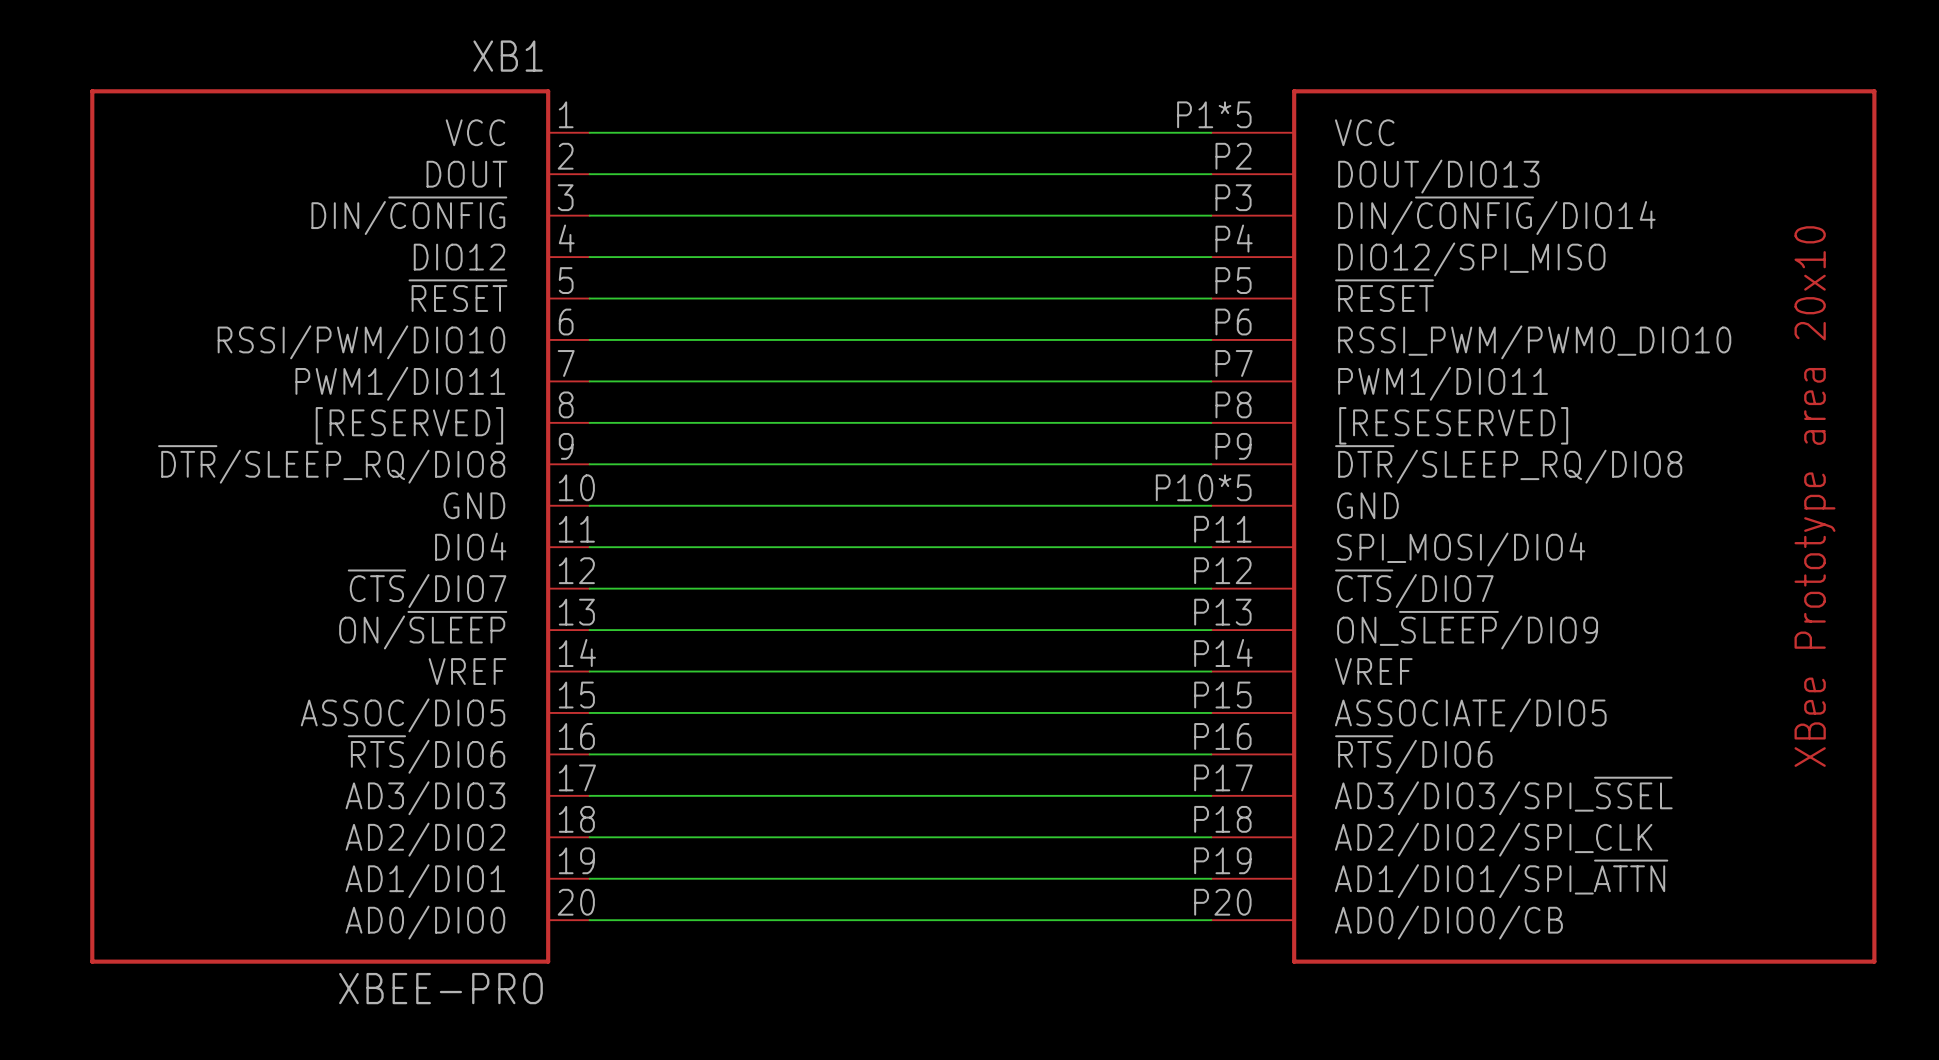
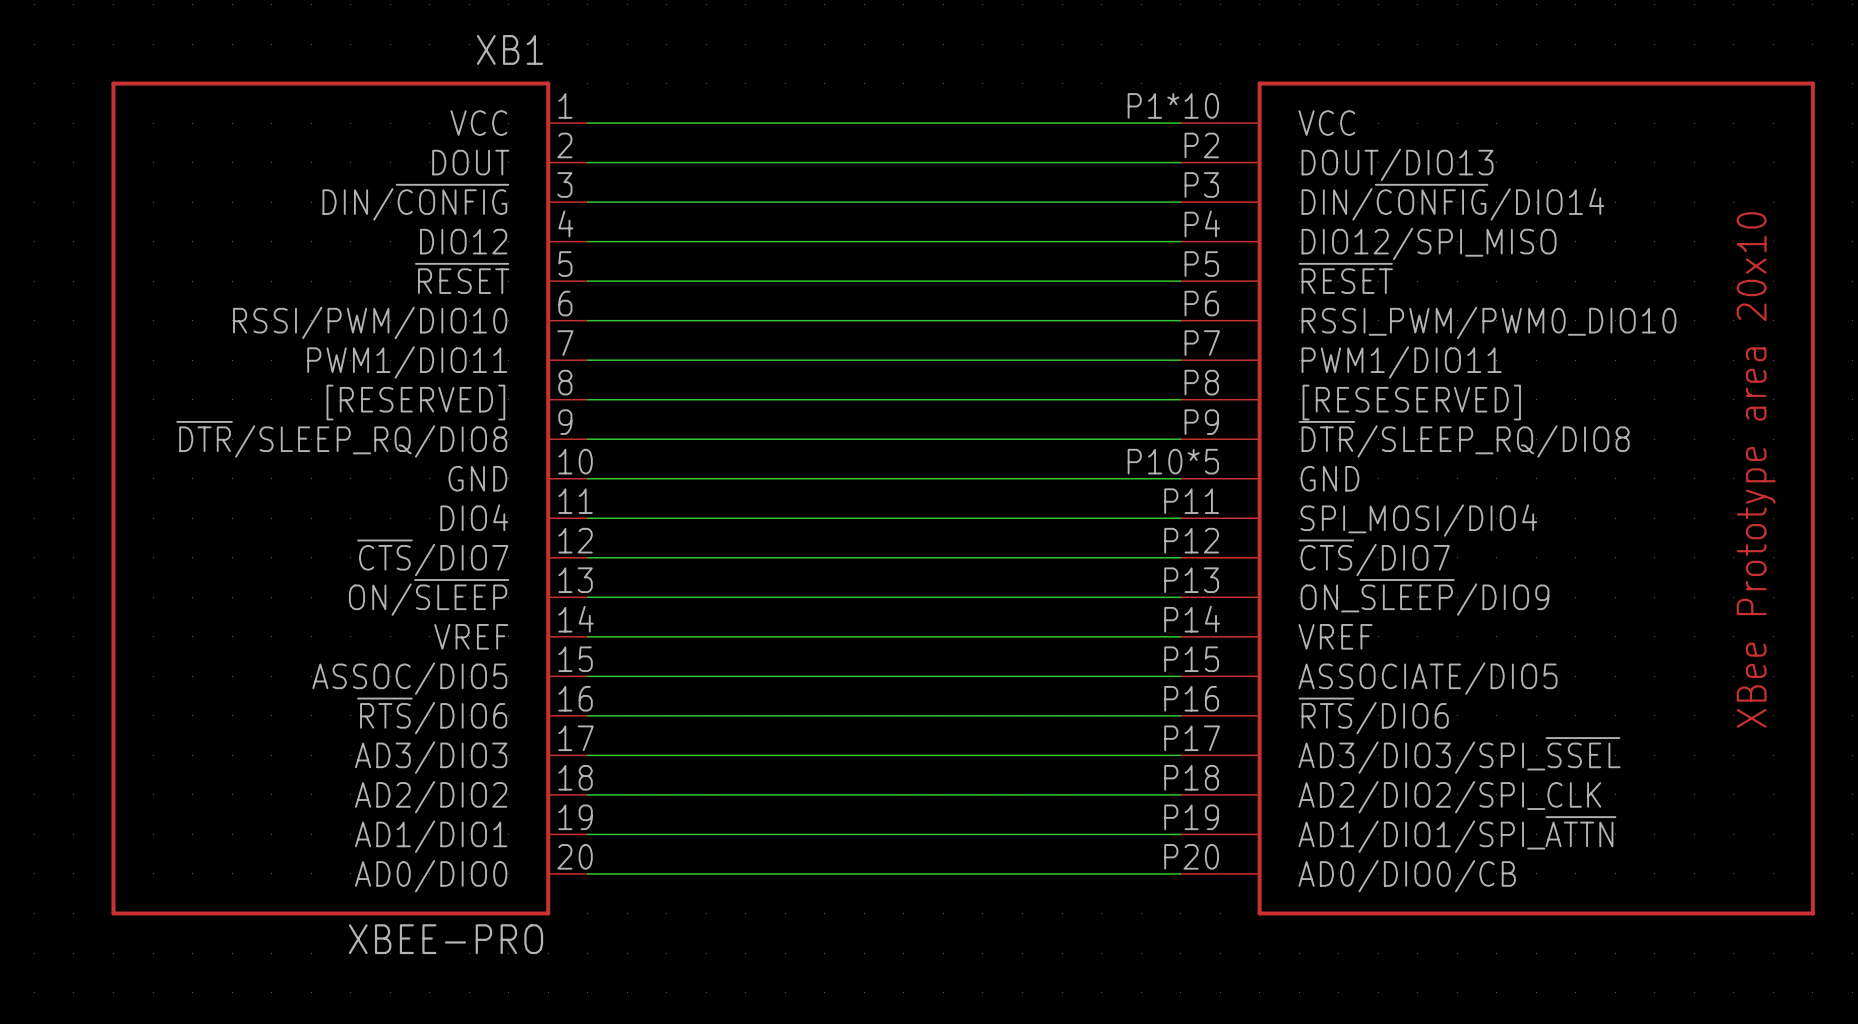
part pin number: P1*5 (1214, 114) -> P1*10 (1173, 105)

